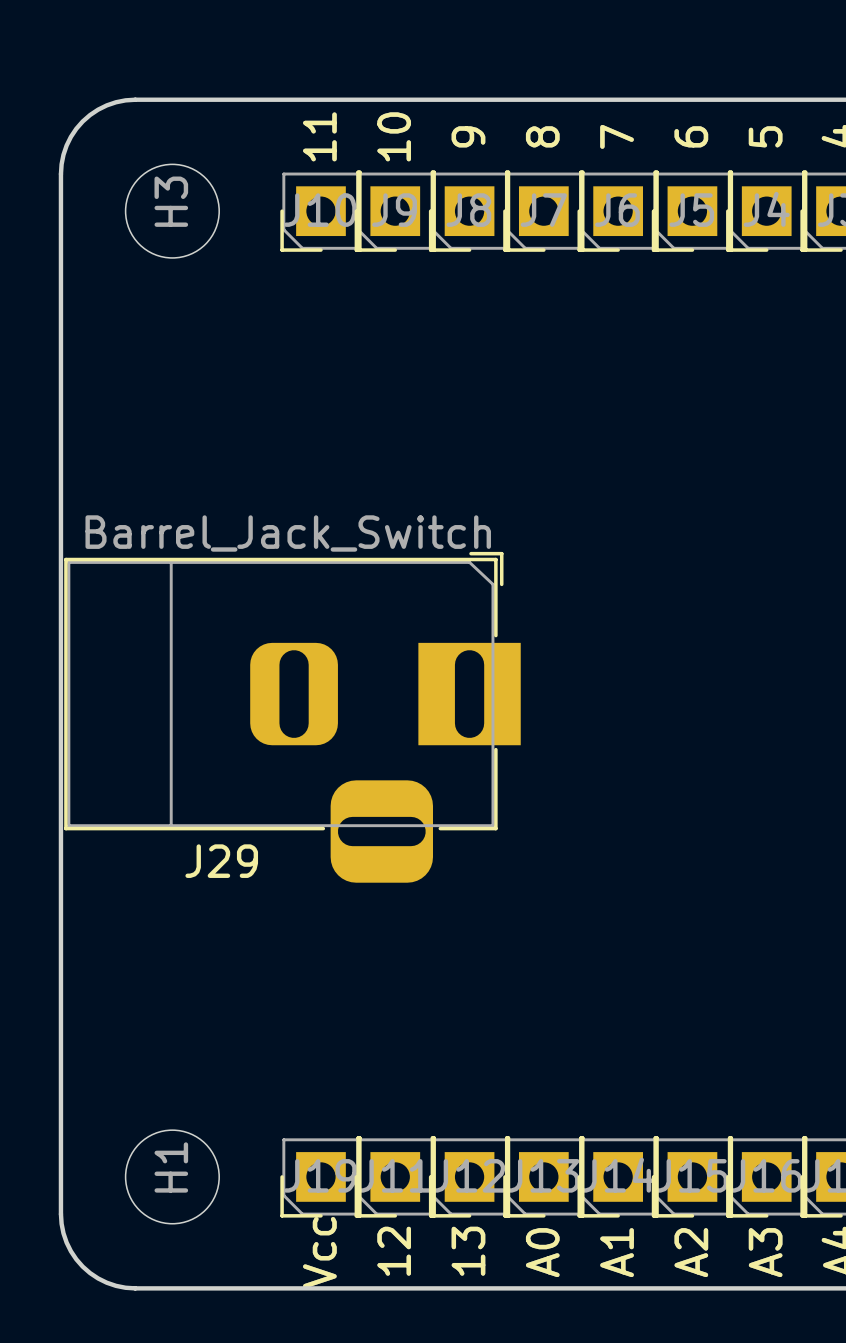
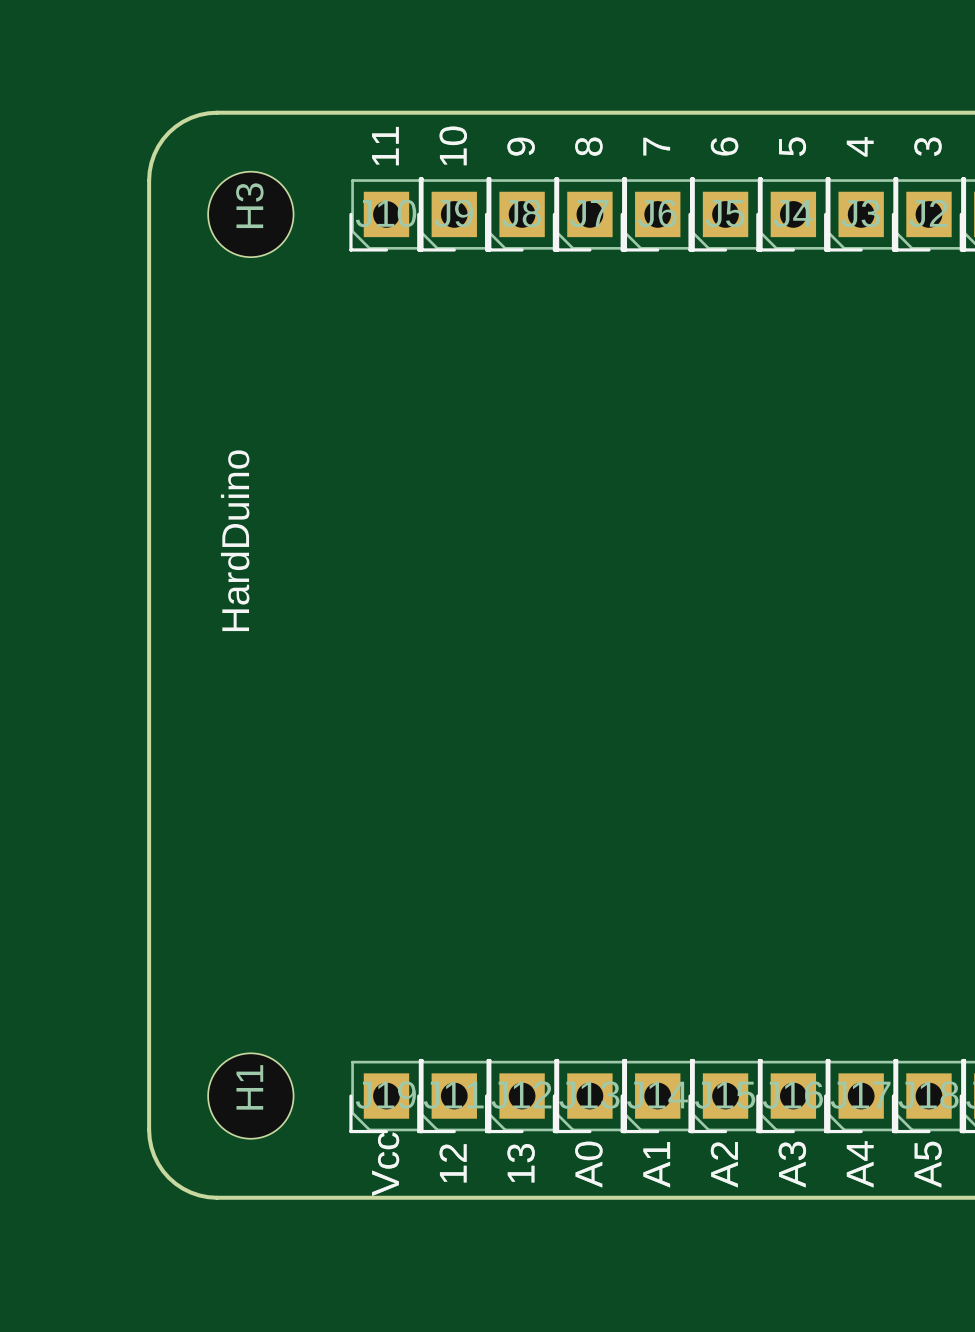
text: none -> HardDuino (235, 540)
J29: Barrel_Jack_Switch (292, 717) -> none

